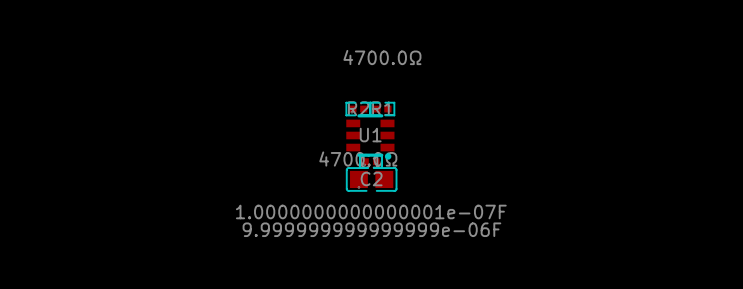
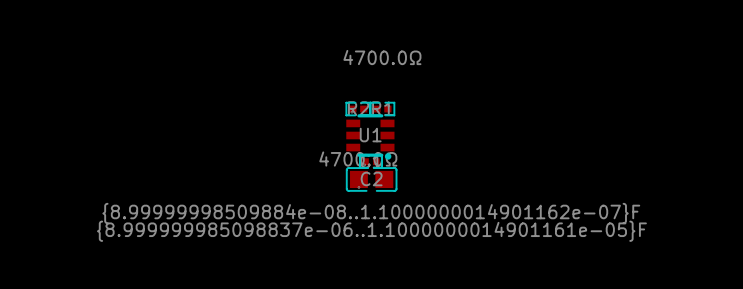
part value: 1.0000000000000001e-07F (371, 211) -> {8.99999998509884e-08..1.1000000014901162e-07}F (371, 213)
C2 value: 9.999999999999999e-06F (371, 229) -> {8.999999985098837e-06..1.1000000014901161e-05}F (371, 231)

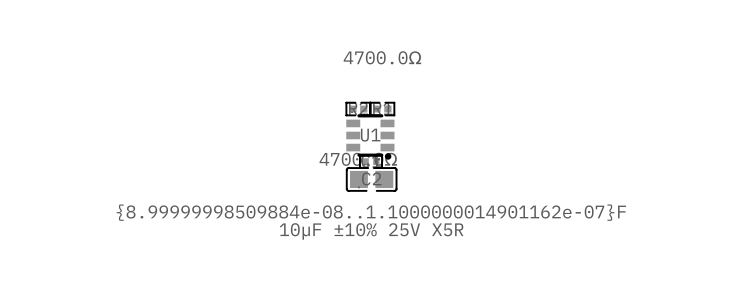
C2 value: {8.999999985098837e-06..1.1000000014901161e-05}F (371, 231) -> 10µF ±10% 25V X5R (371, 231)

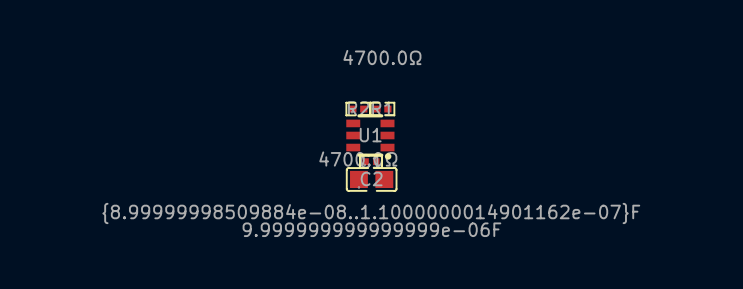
C2 value: 10µF ±10% 25V X5R (371, 231) -> 9.999999999999999e-06F (371, 229)

